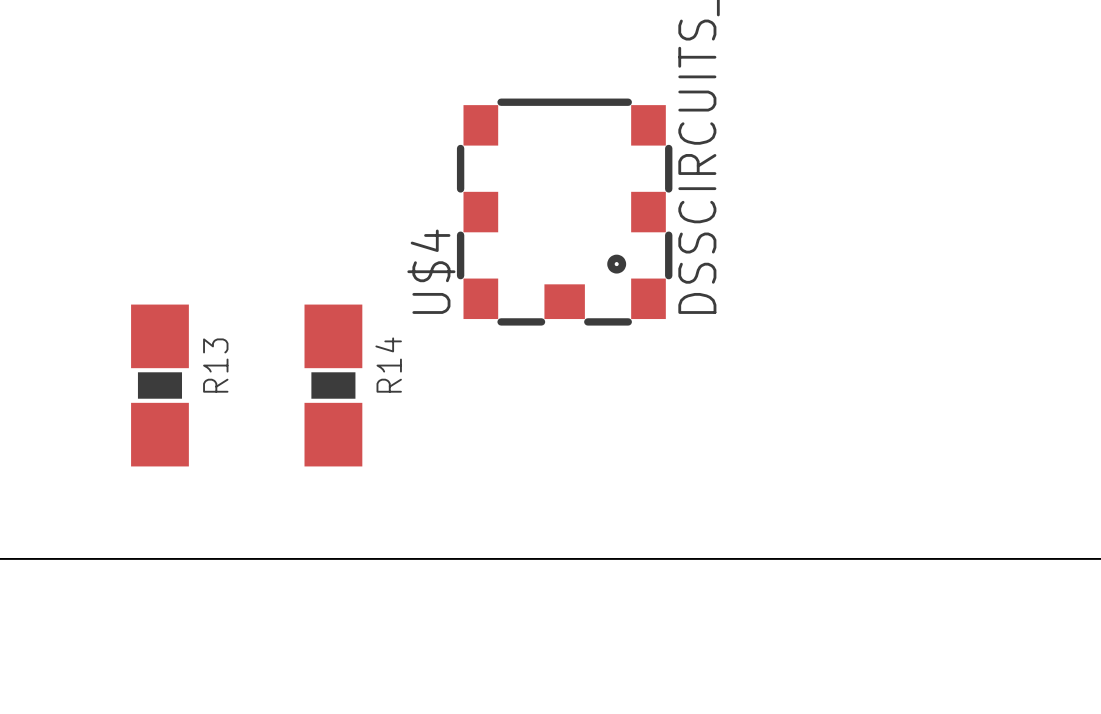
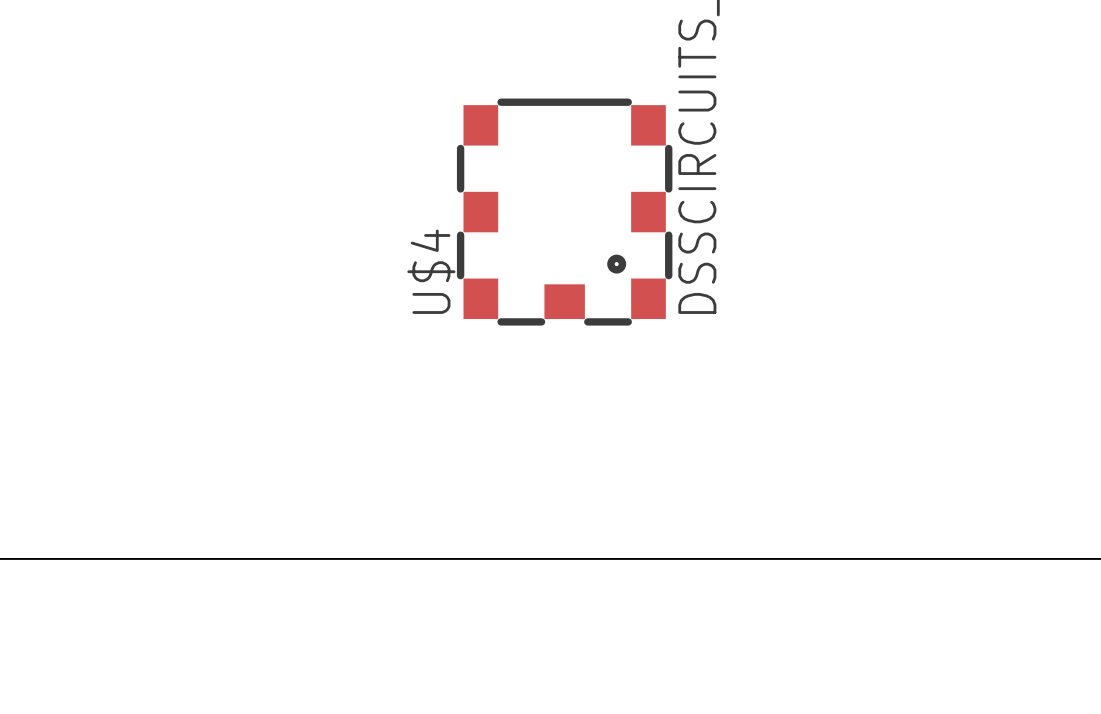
R13: (159, 385) -> none
R14: (333, 385) -> none

